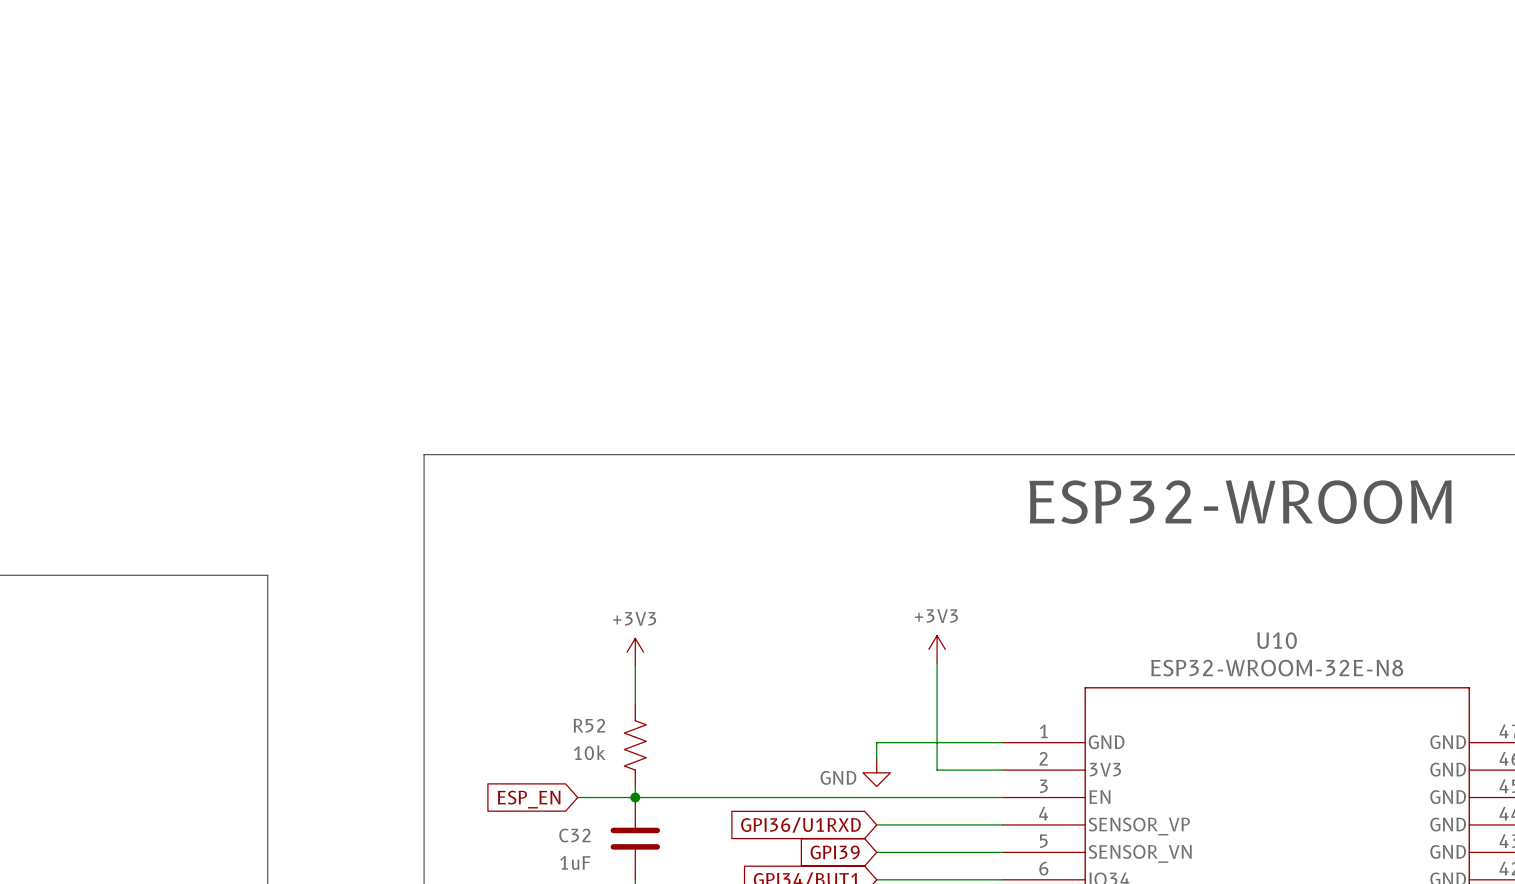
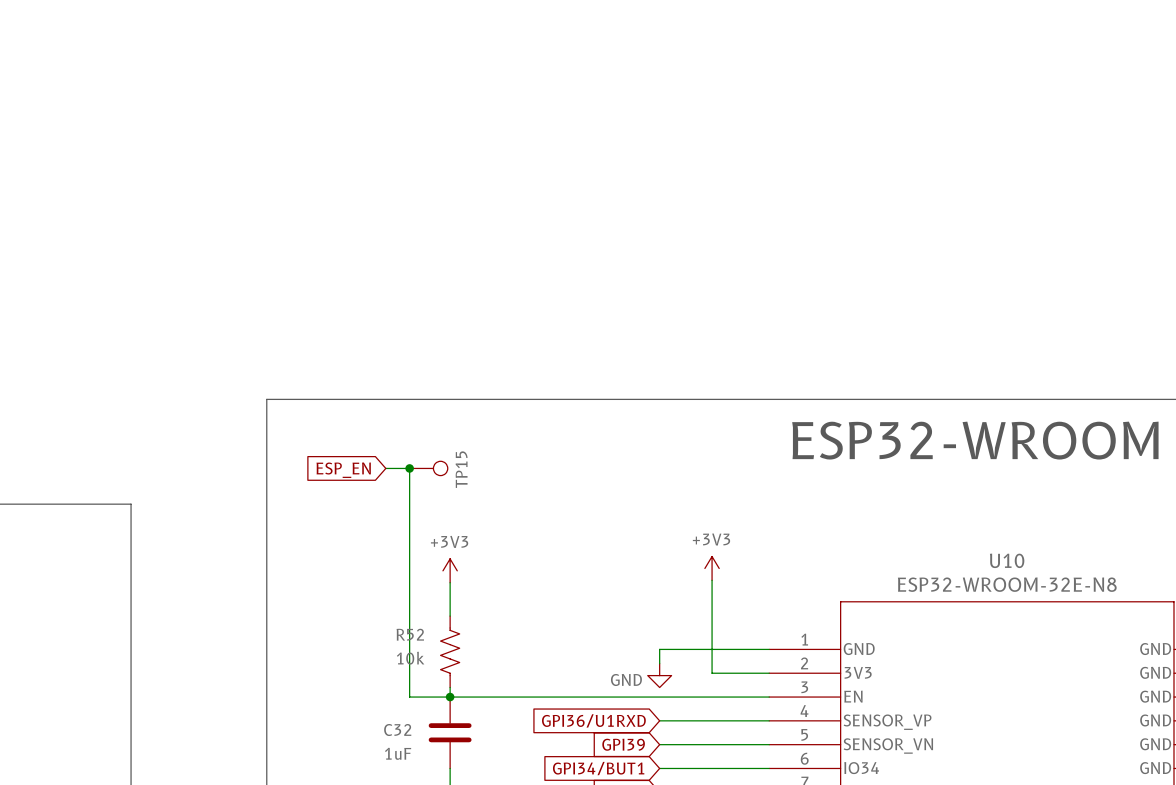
junction: none -> (409, 468)
TP15: none -> (428, 468)
wire: (577, 797) (588, 797) -> (385, 468) (409, 468) (409, 697)
global label position: ESP_EN (529, 799) -> ESP_EN (343, 470)

